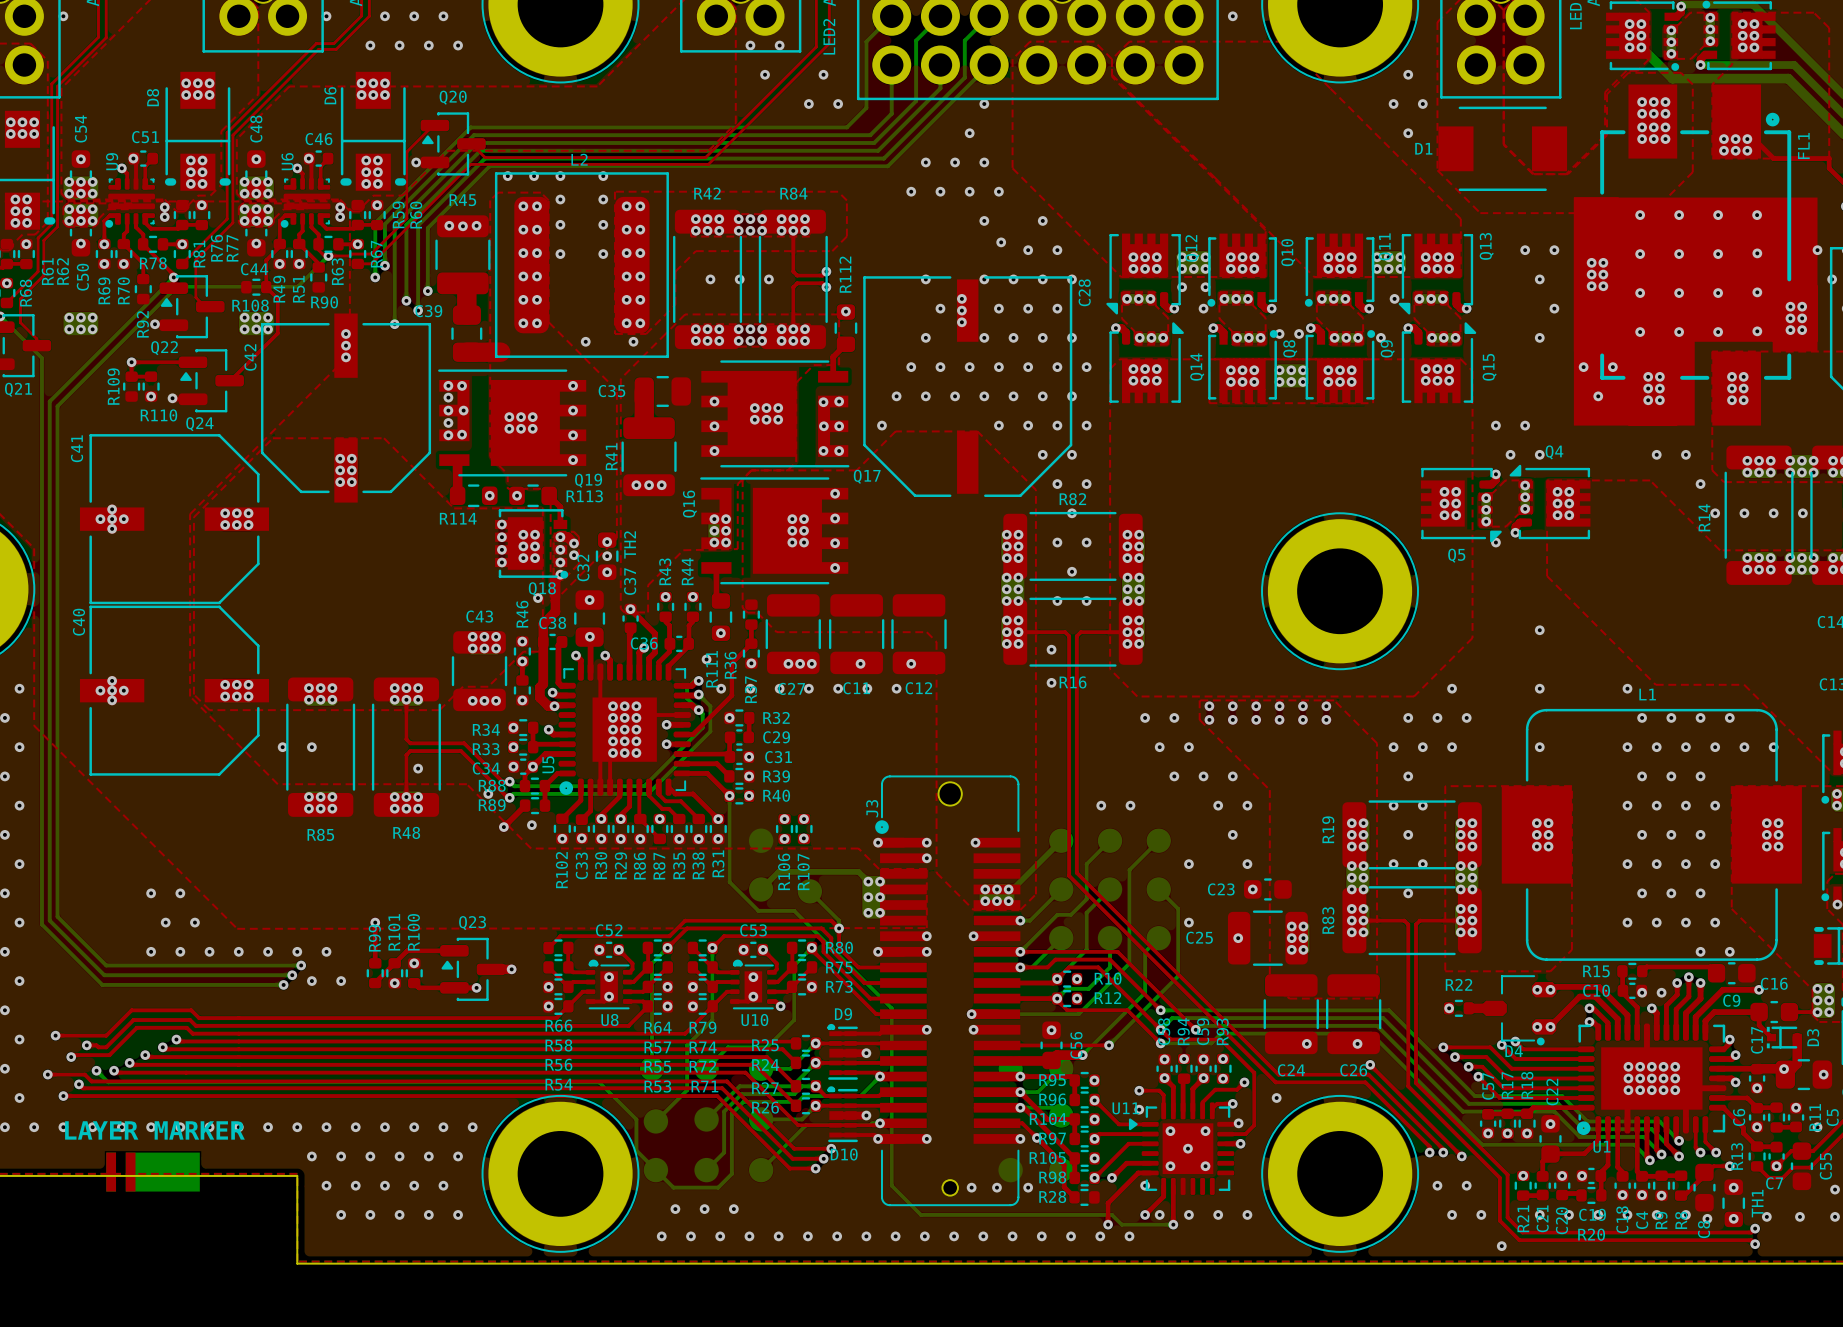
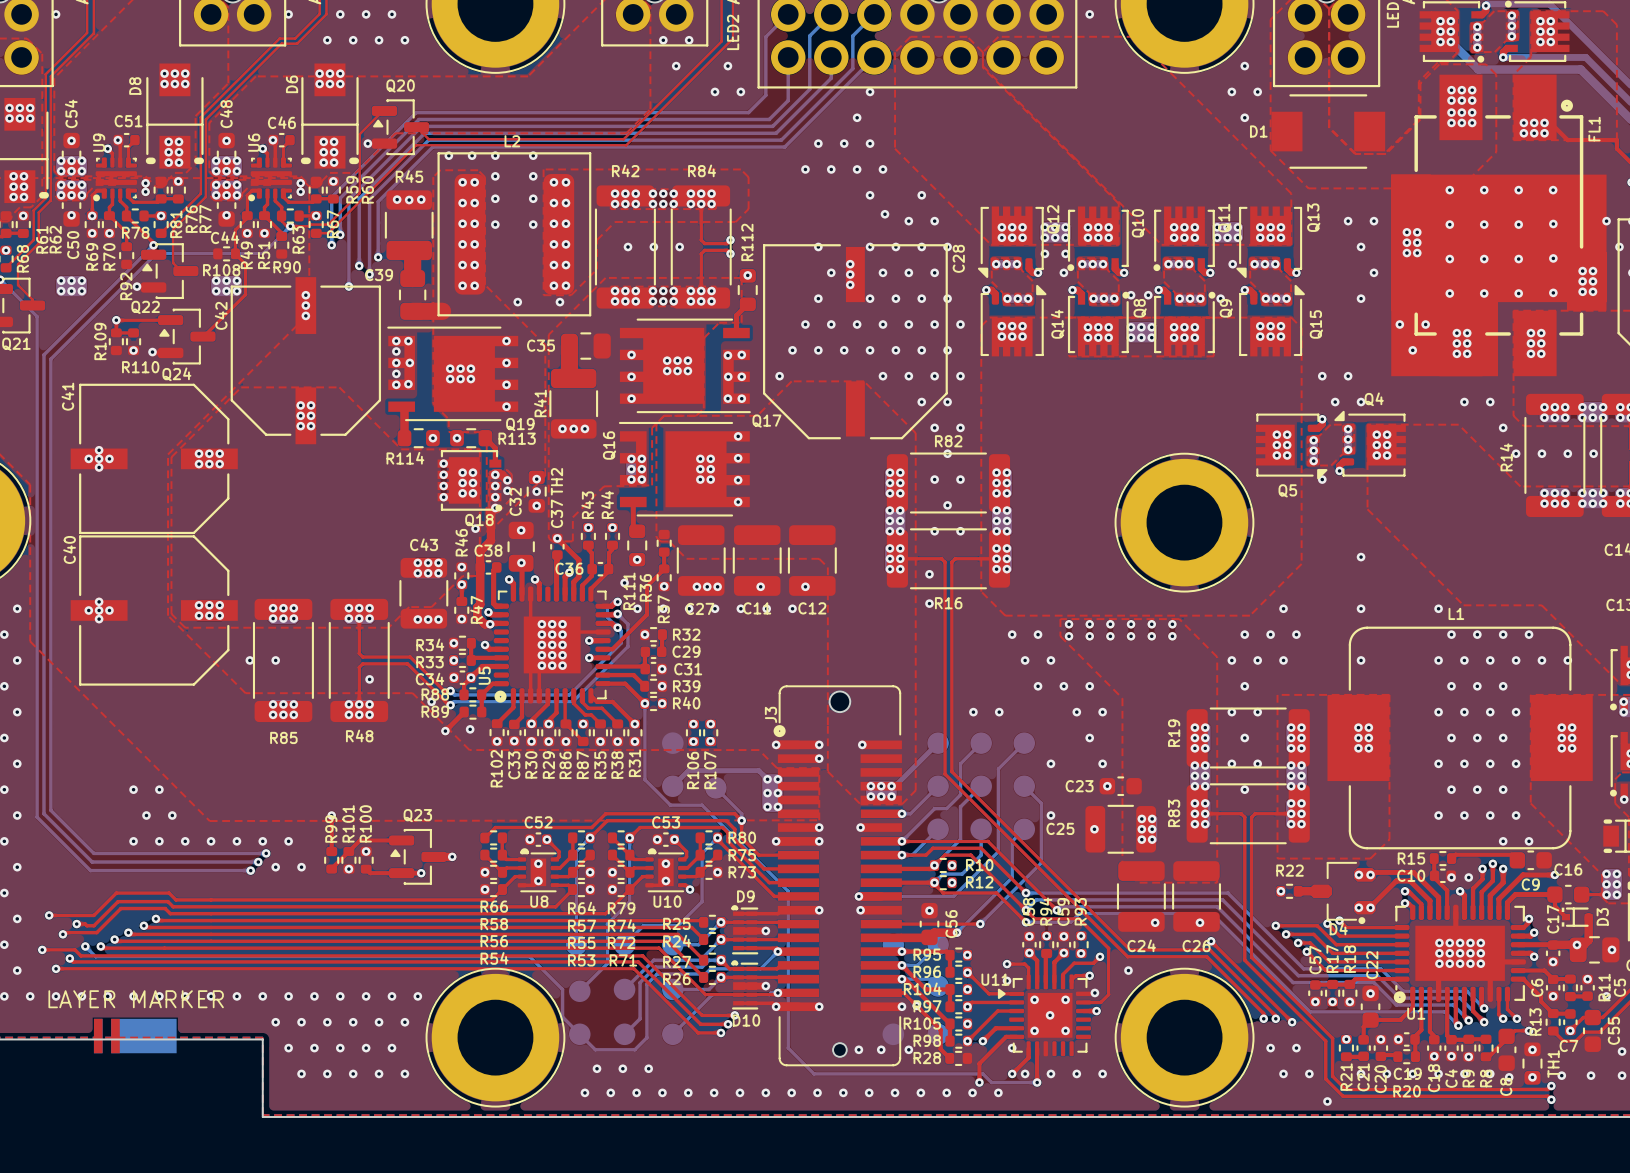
R47 name: none -> R47 (476, 609)

